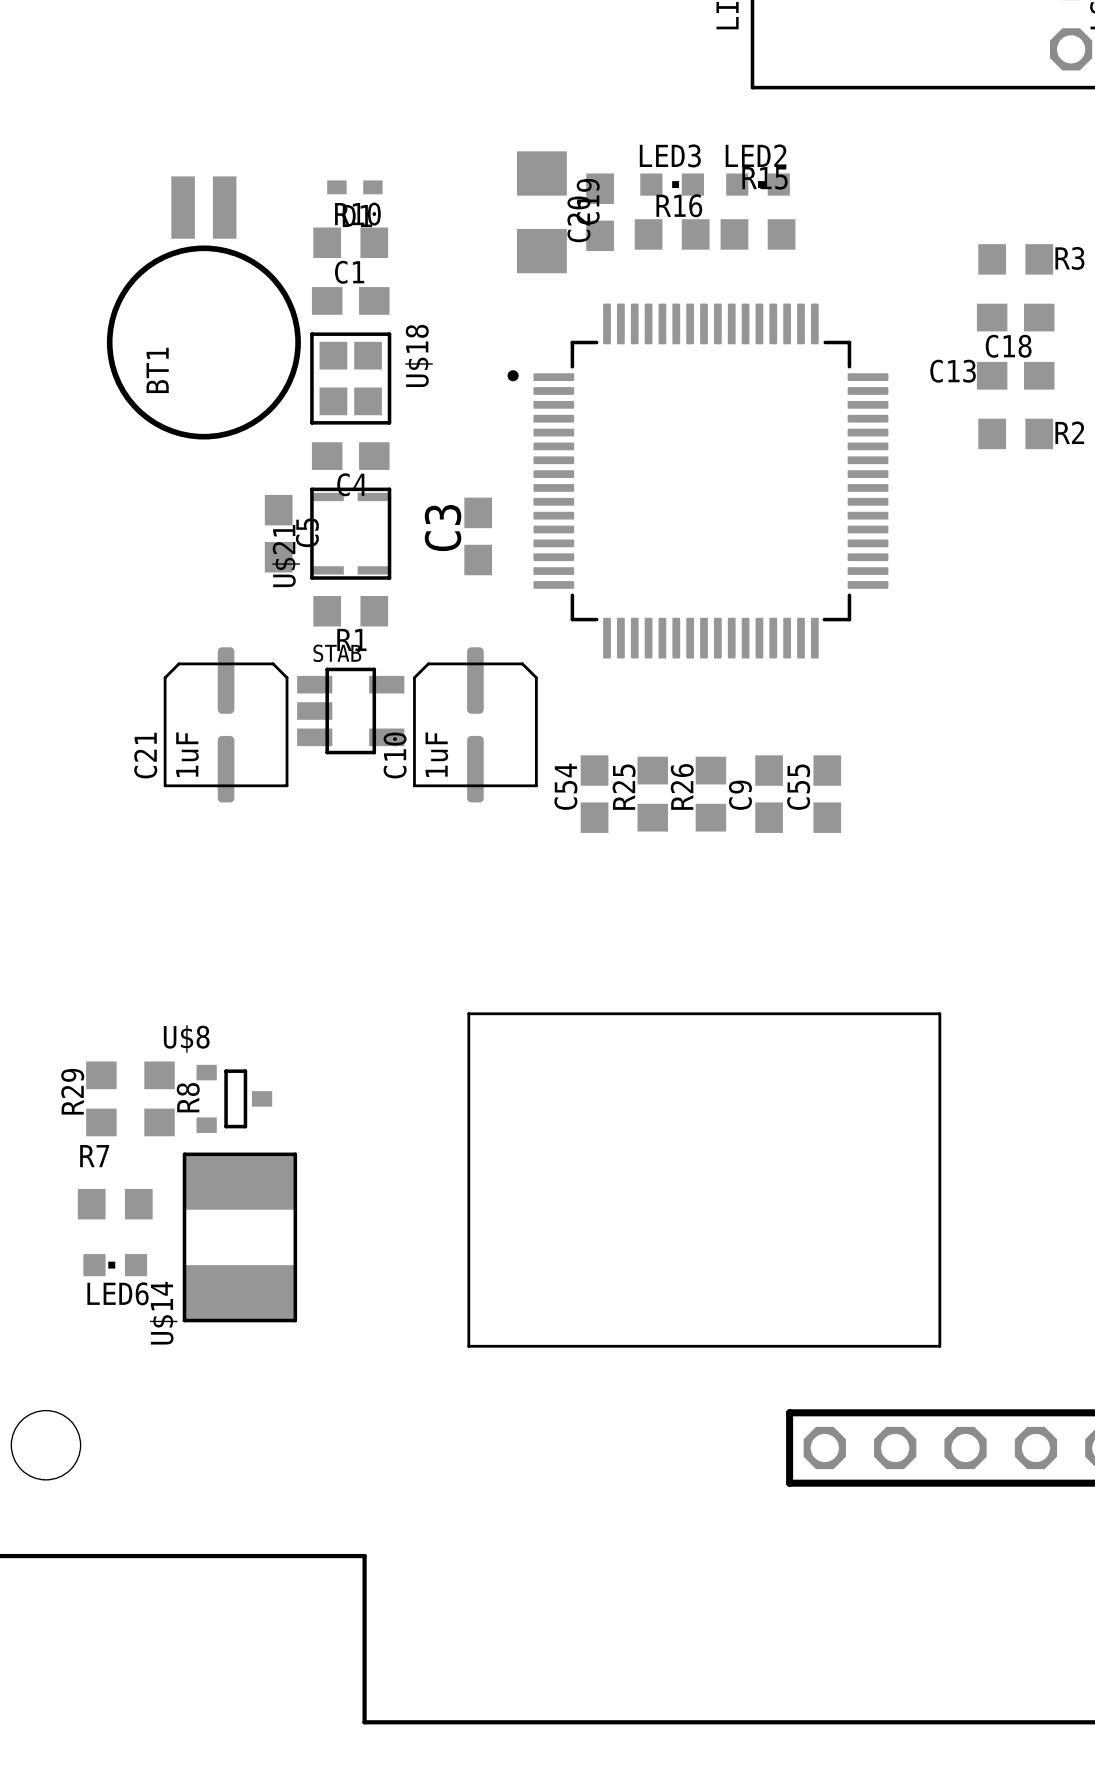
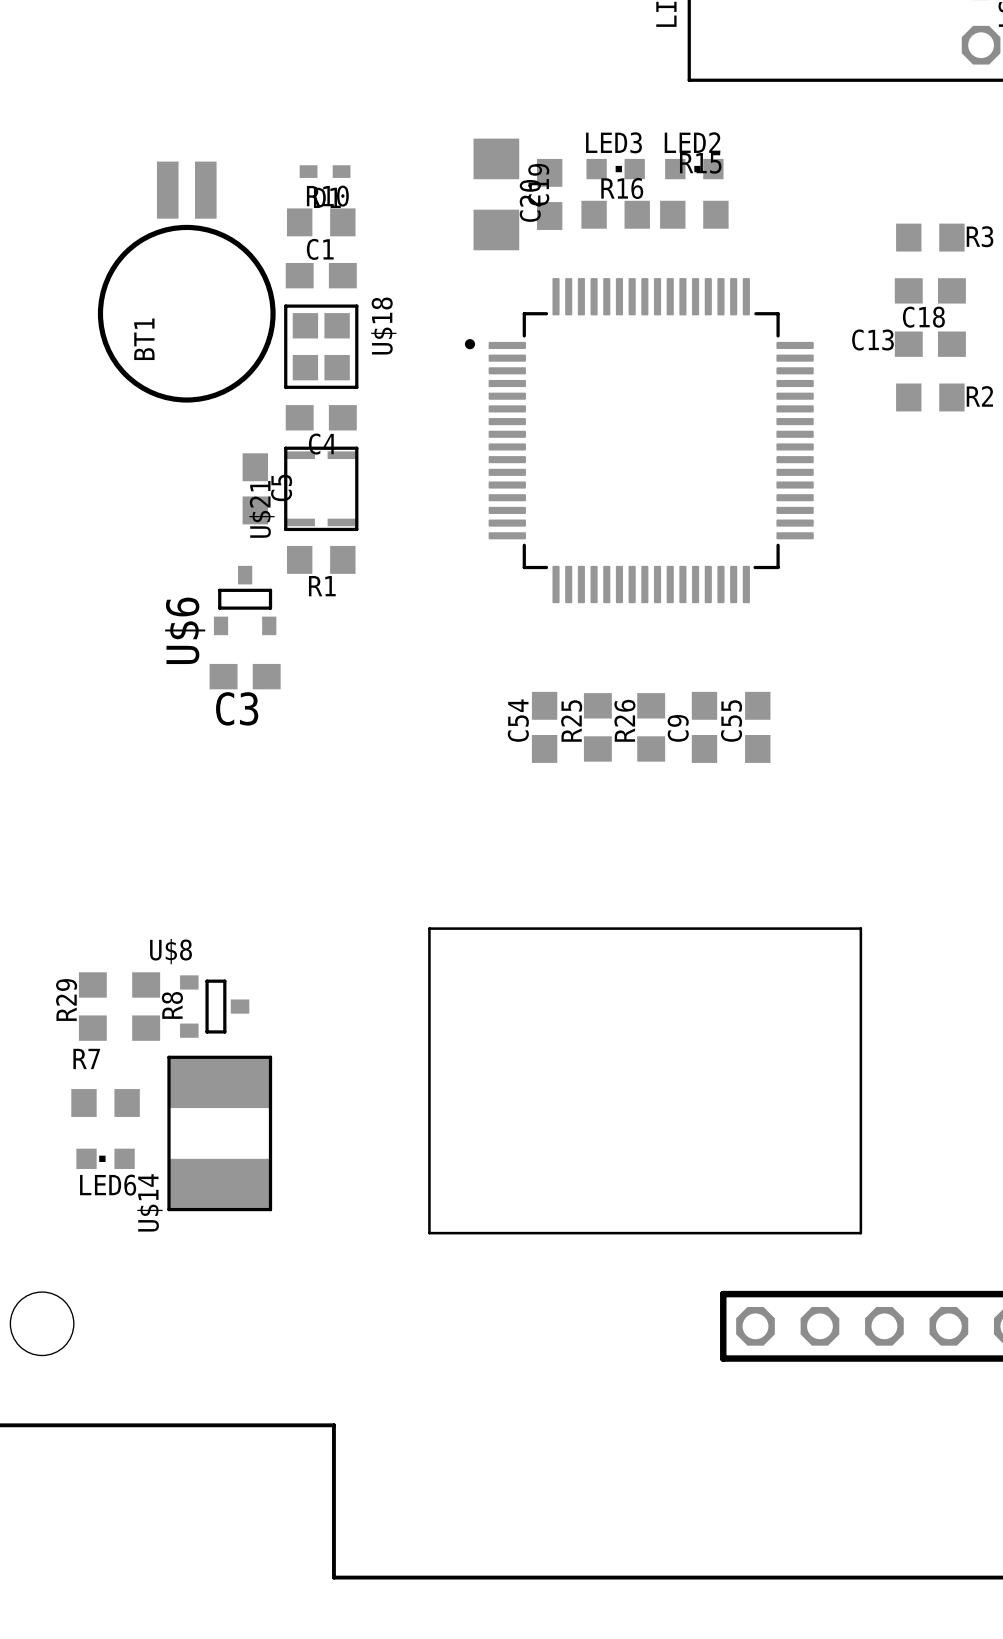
C3 name position: C3 (443, 528) -> C3 (237, 708)
C3 rotation: 0° (478, 536) -> 90° clockwise (245, 676)
C3 position: (478, 536) -> (245, 676)
U$6: none -> (245, 600)
STAB: (350, 711) -> none
C21: 1uF (226, 724) -> none
C10: 1uF (475, 724) -> none

